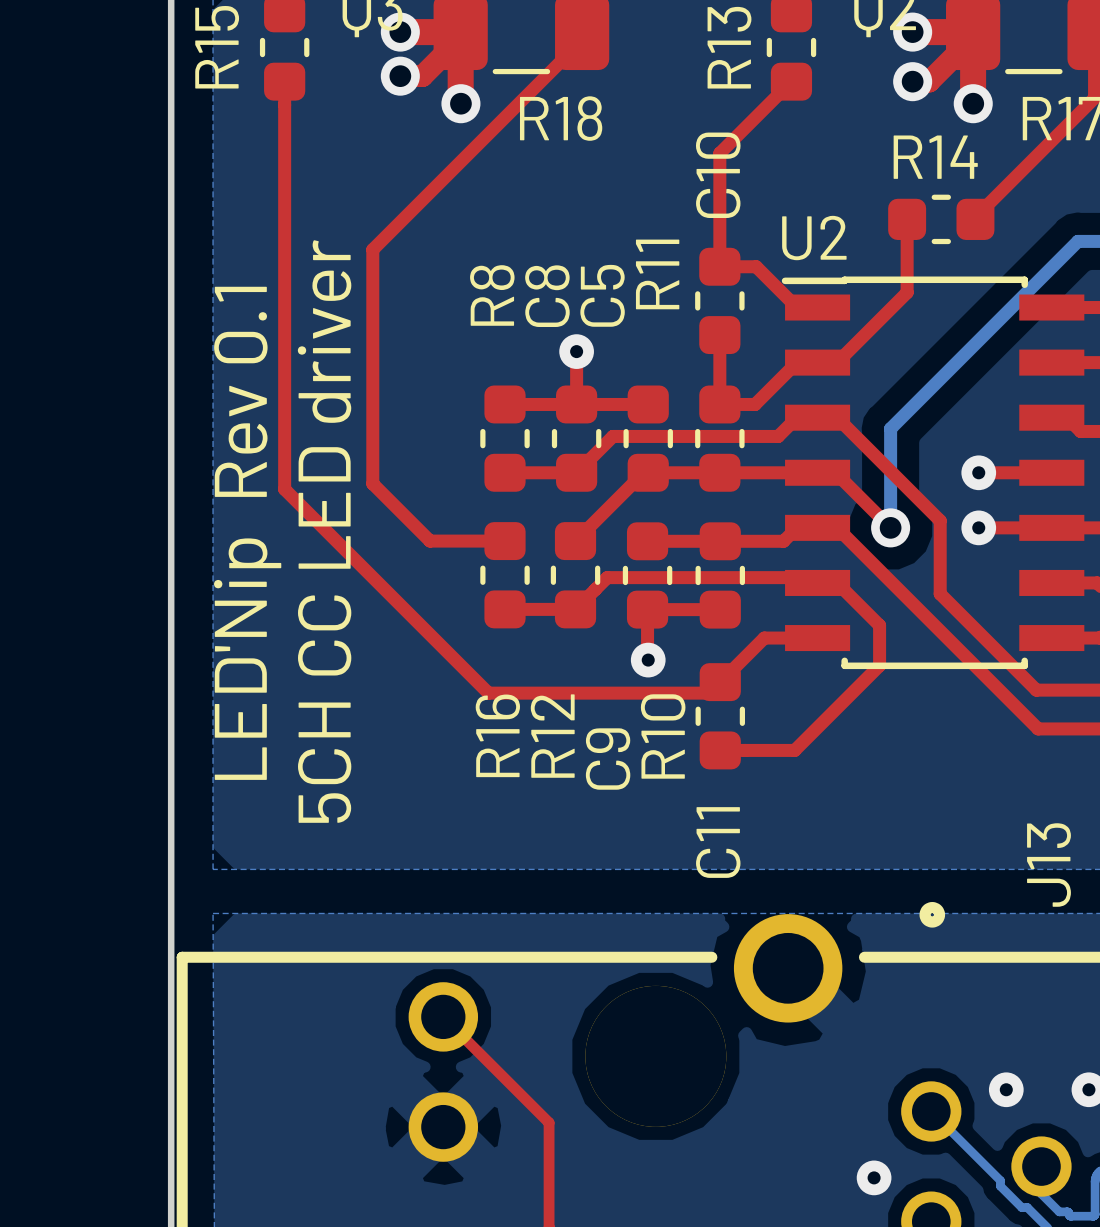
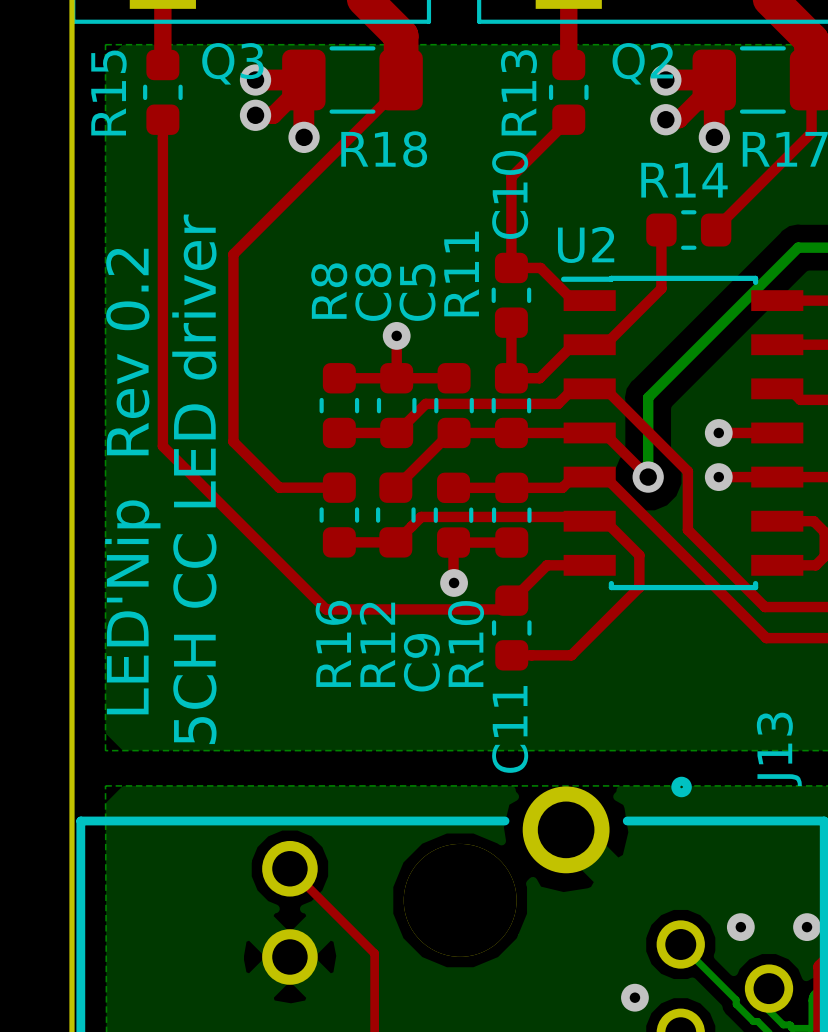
text: LED'Nip Rev 0.1 (247, 533) -> LED'Nip Rev 0.2 (132, 481)

